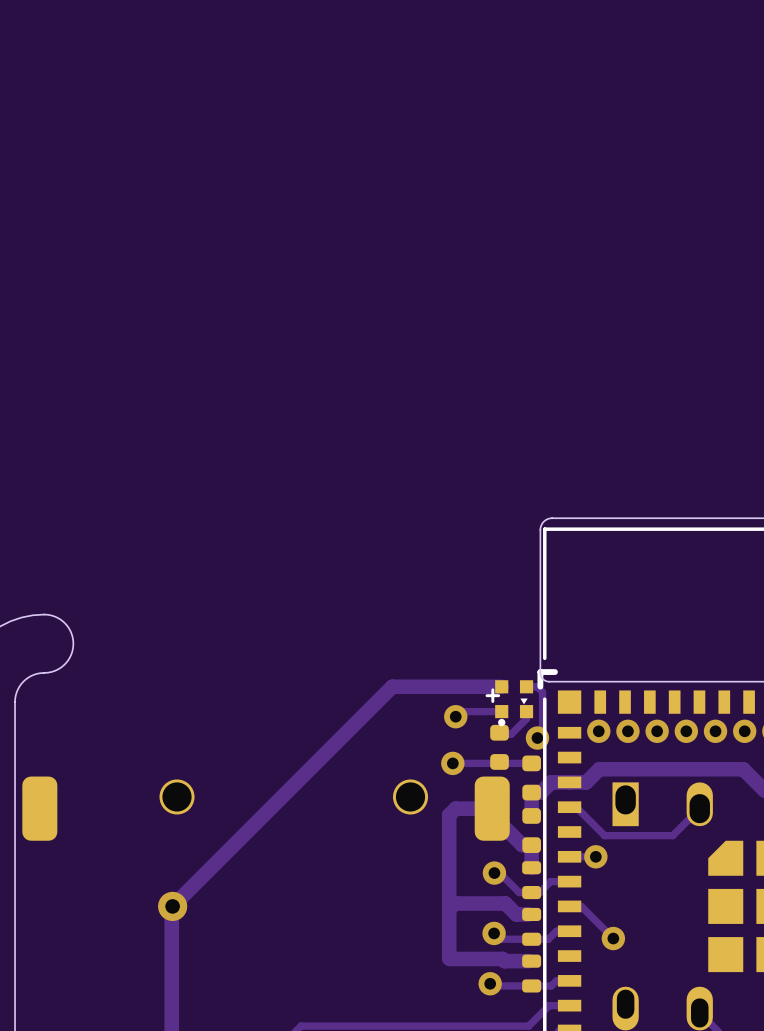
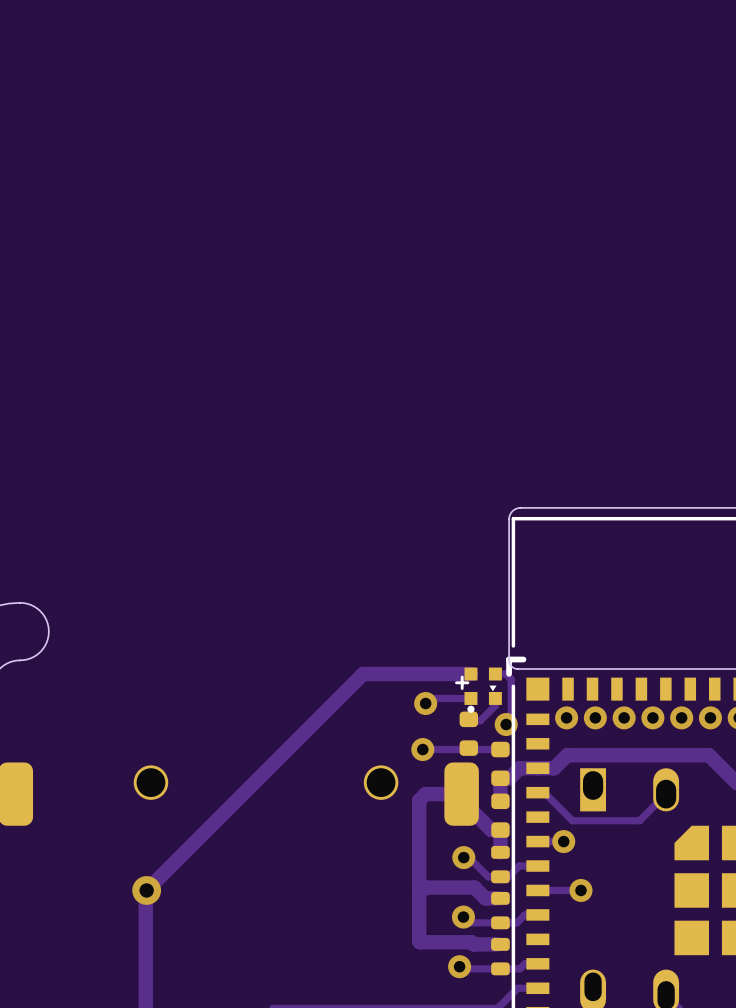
track: (581, 906) (613, 938) -> (549, 890) (580, 890)
via position: (613, 938) -> (580, 890)

